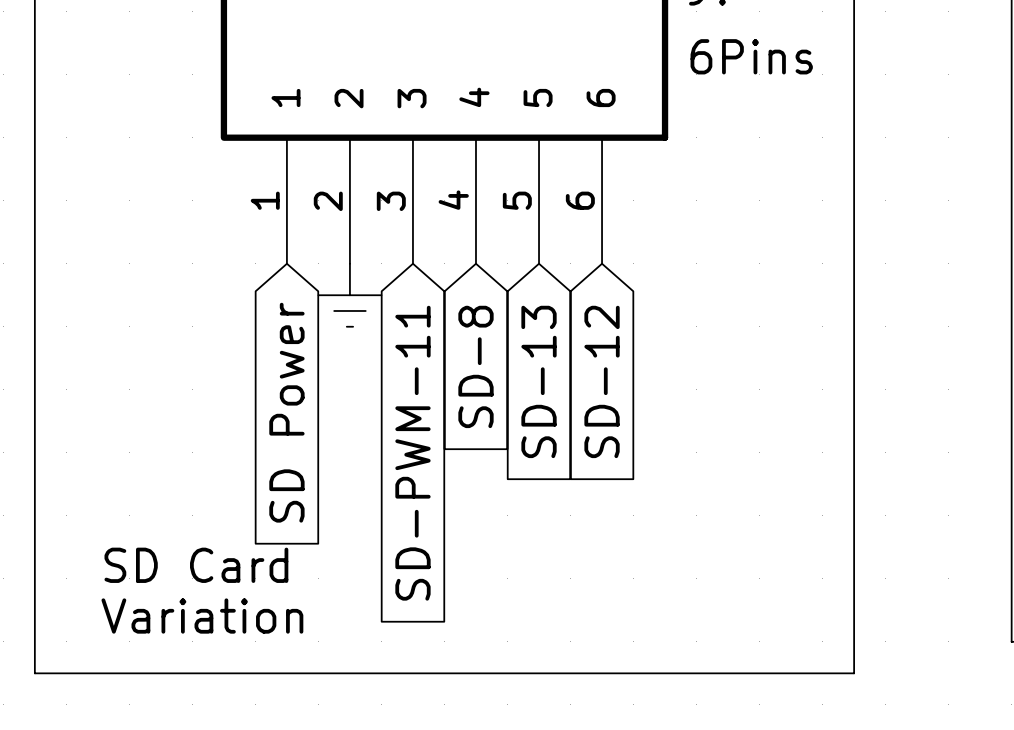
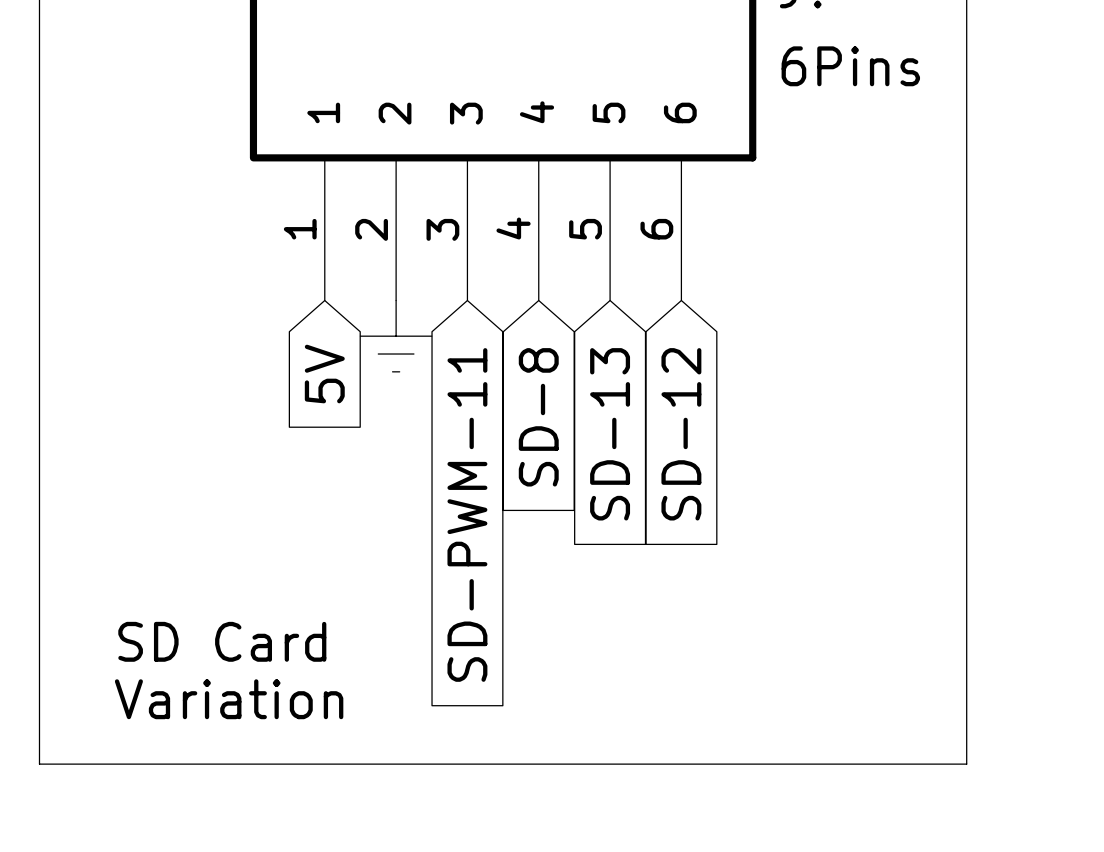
global label: SD Power (286, 412) -> 5V (324, 374)

